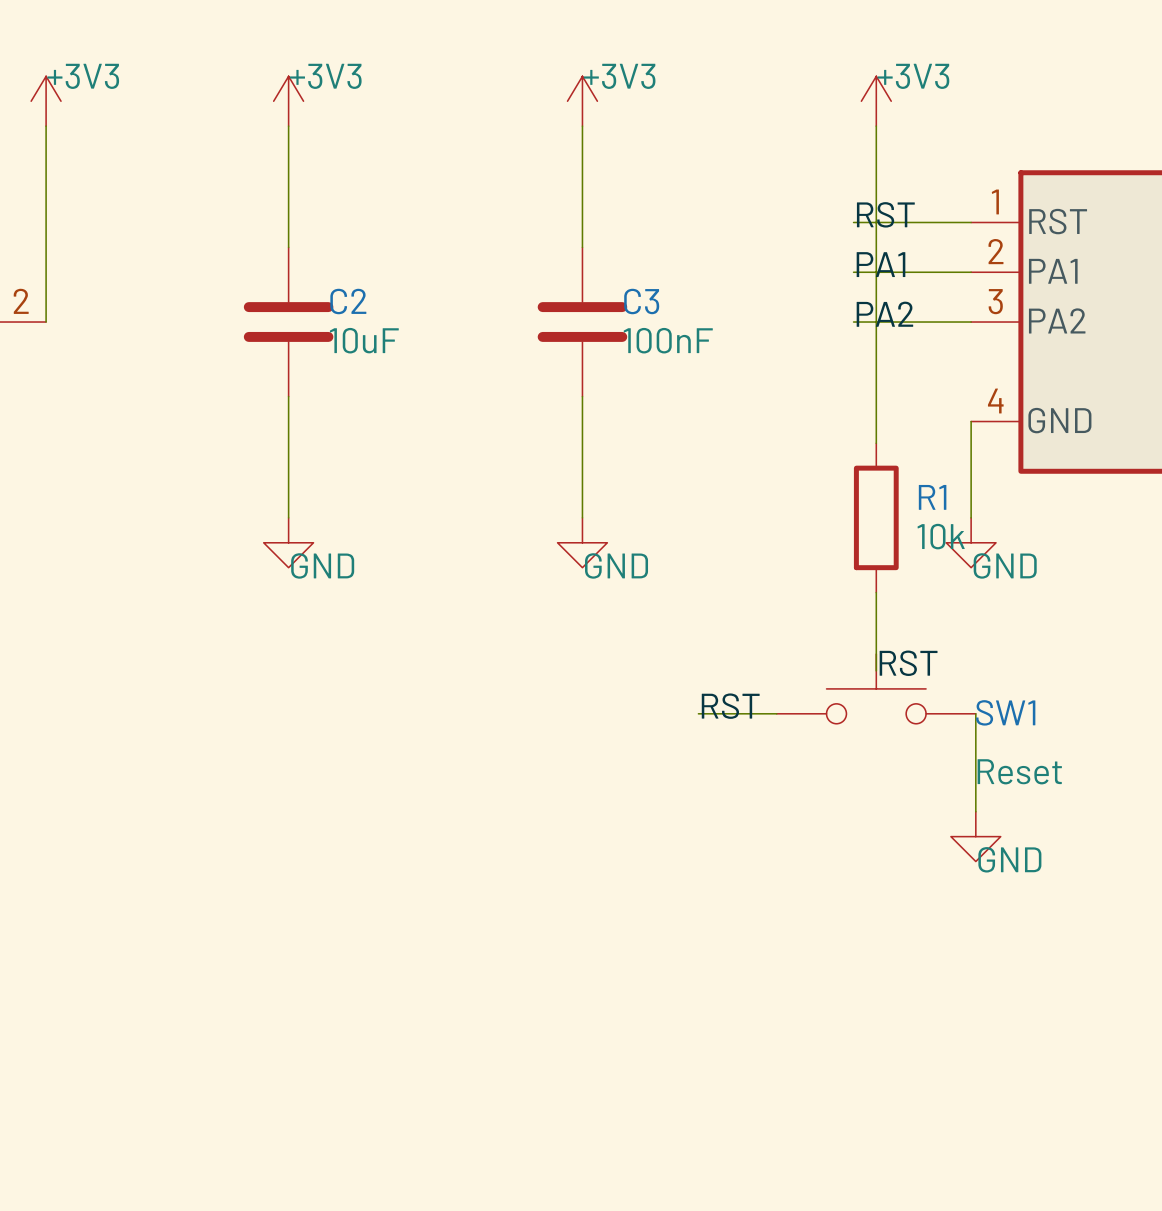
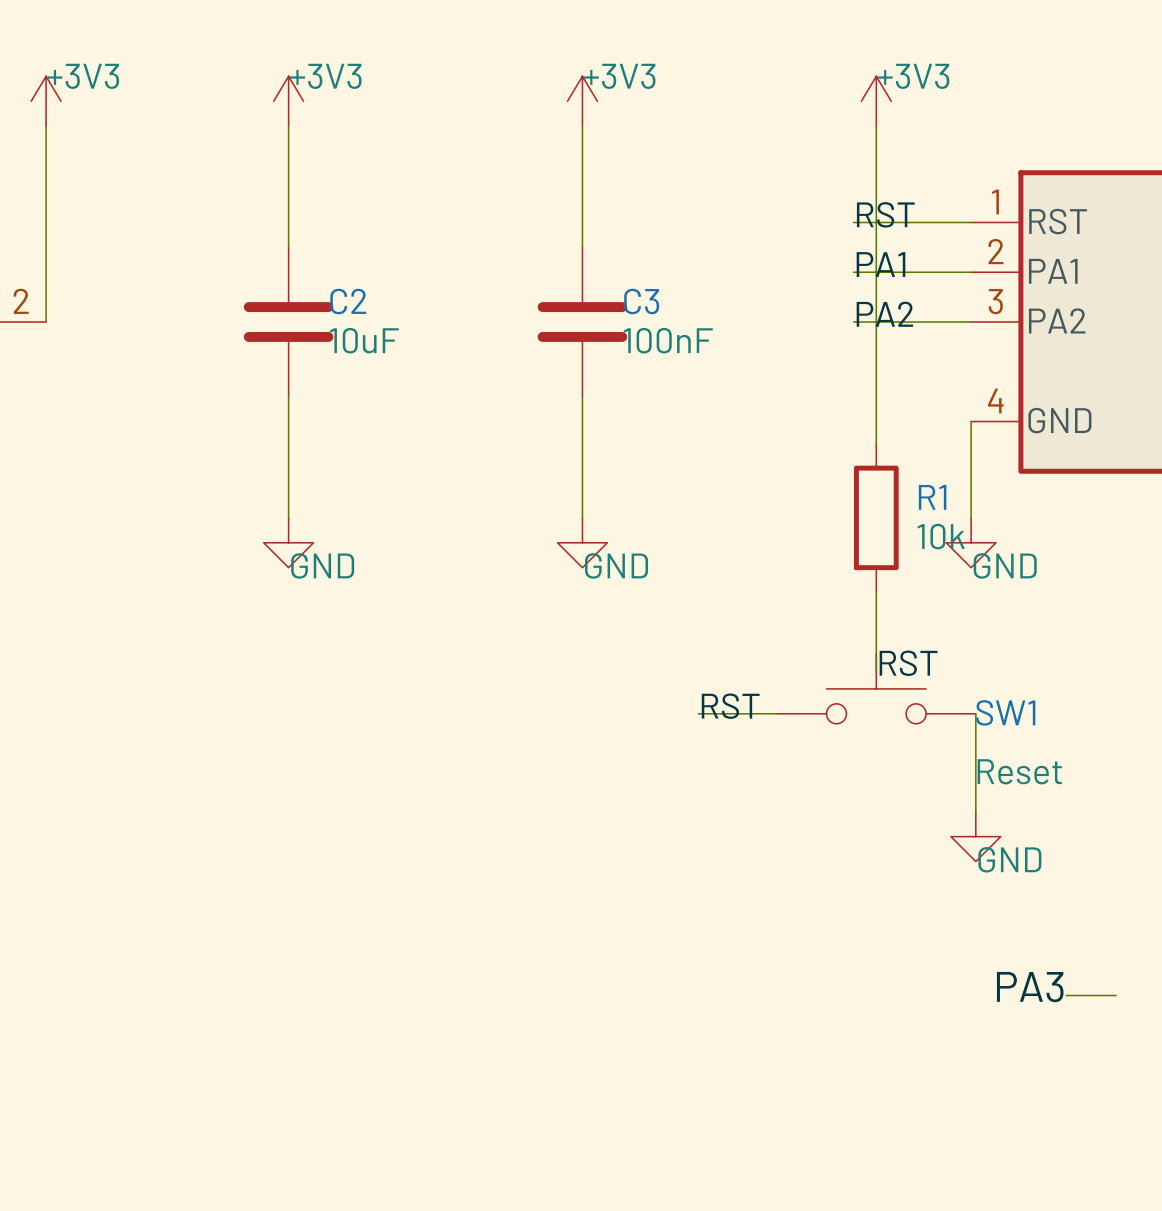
label: none -> PA3 (1030, 987)
wire: none -> (1066, 995) (1116, 995)

